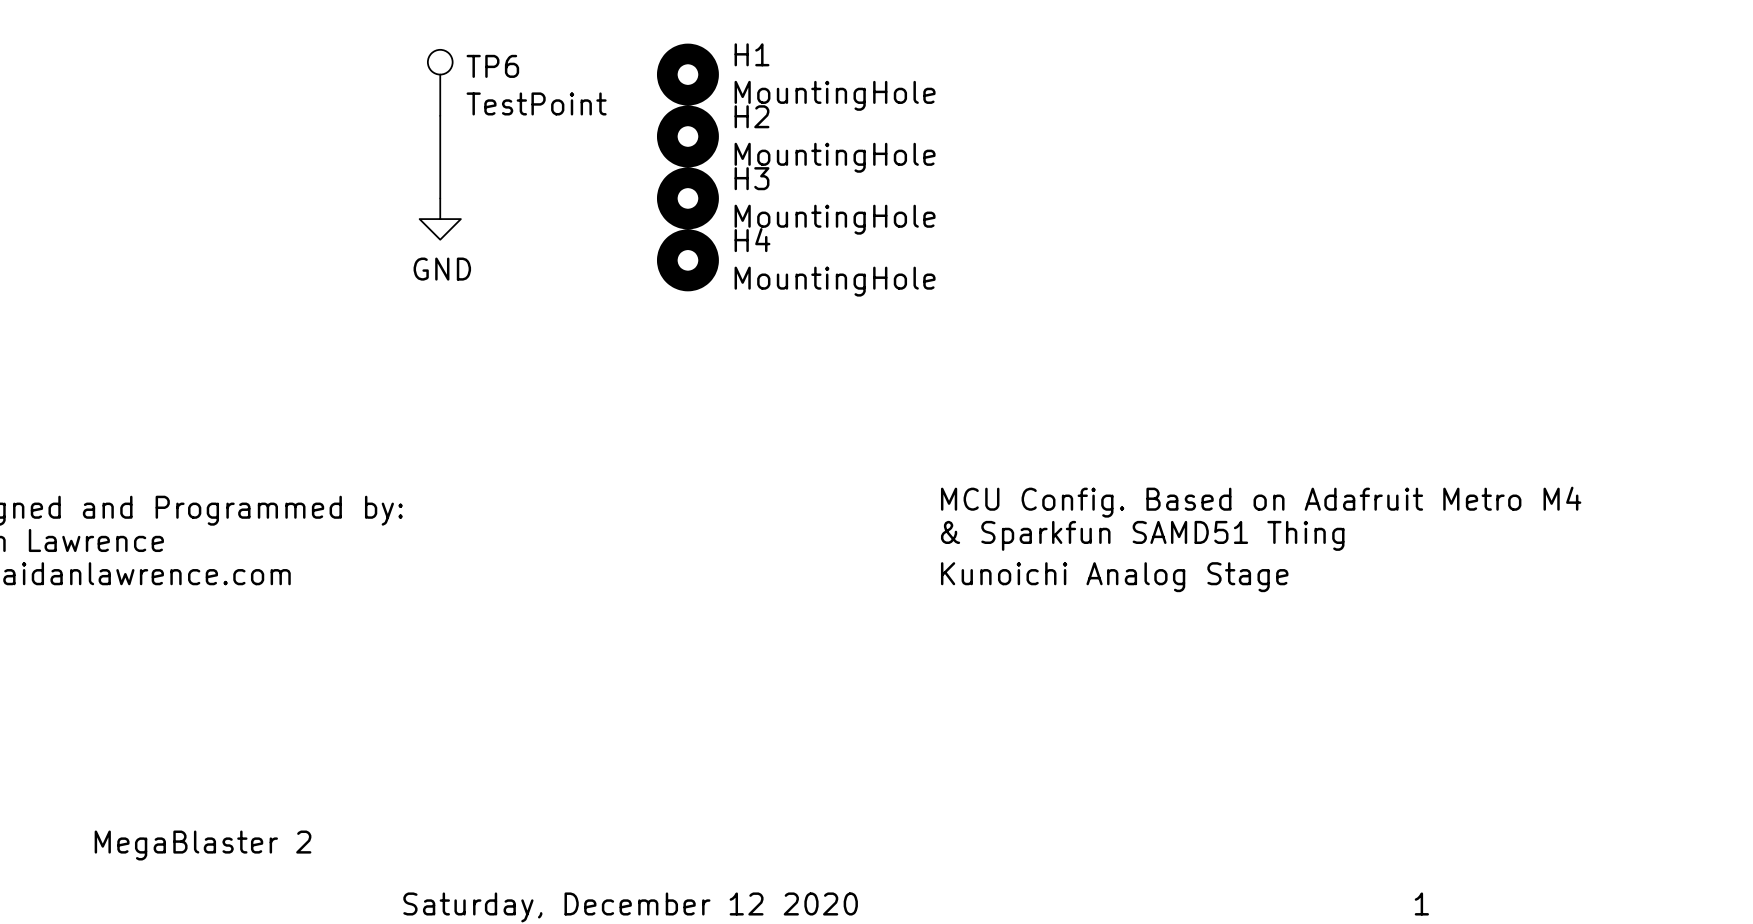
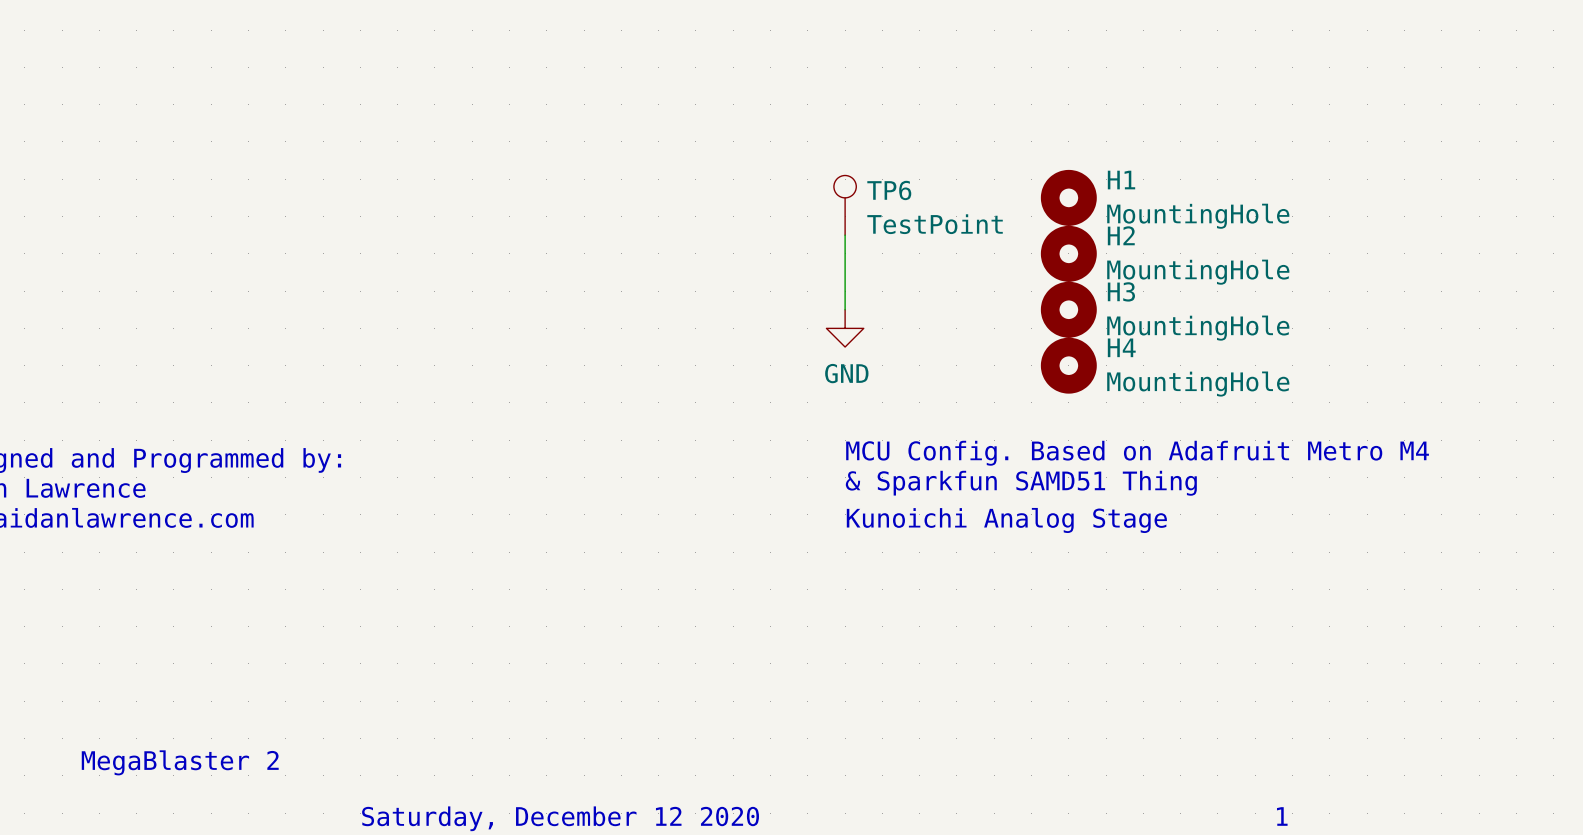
H1 position: (687, 74) -> (1068, 197)
TP6 position: (440, 82) -> (845, 205)
wire: (440, 115) (440, 198) -> none
H2 position: (687, 136) -> (1068, 253)
H3 position: (687, 198) -> (1068, 309)
power symbol: GND (440, 219) -> none
H4 position: (687, 260) -> (1068, 365)
wire: none -> (845, 235) (845, 309)
power symbol: none -> GND (845, 328)

